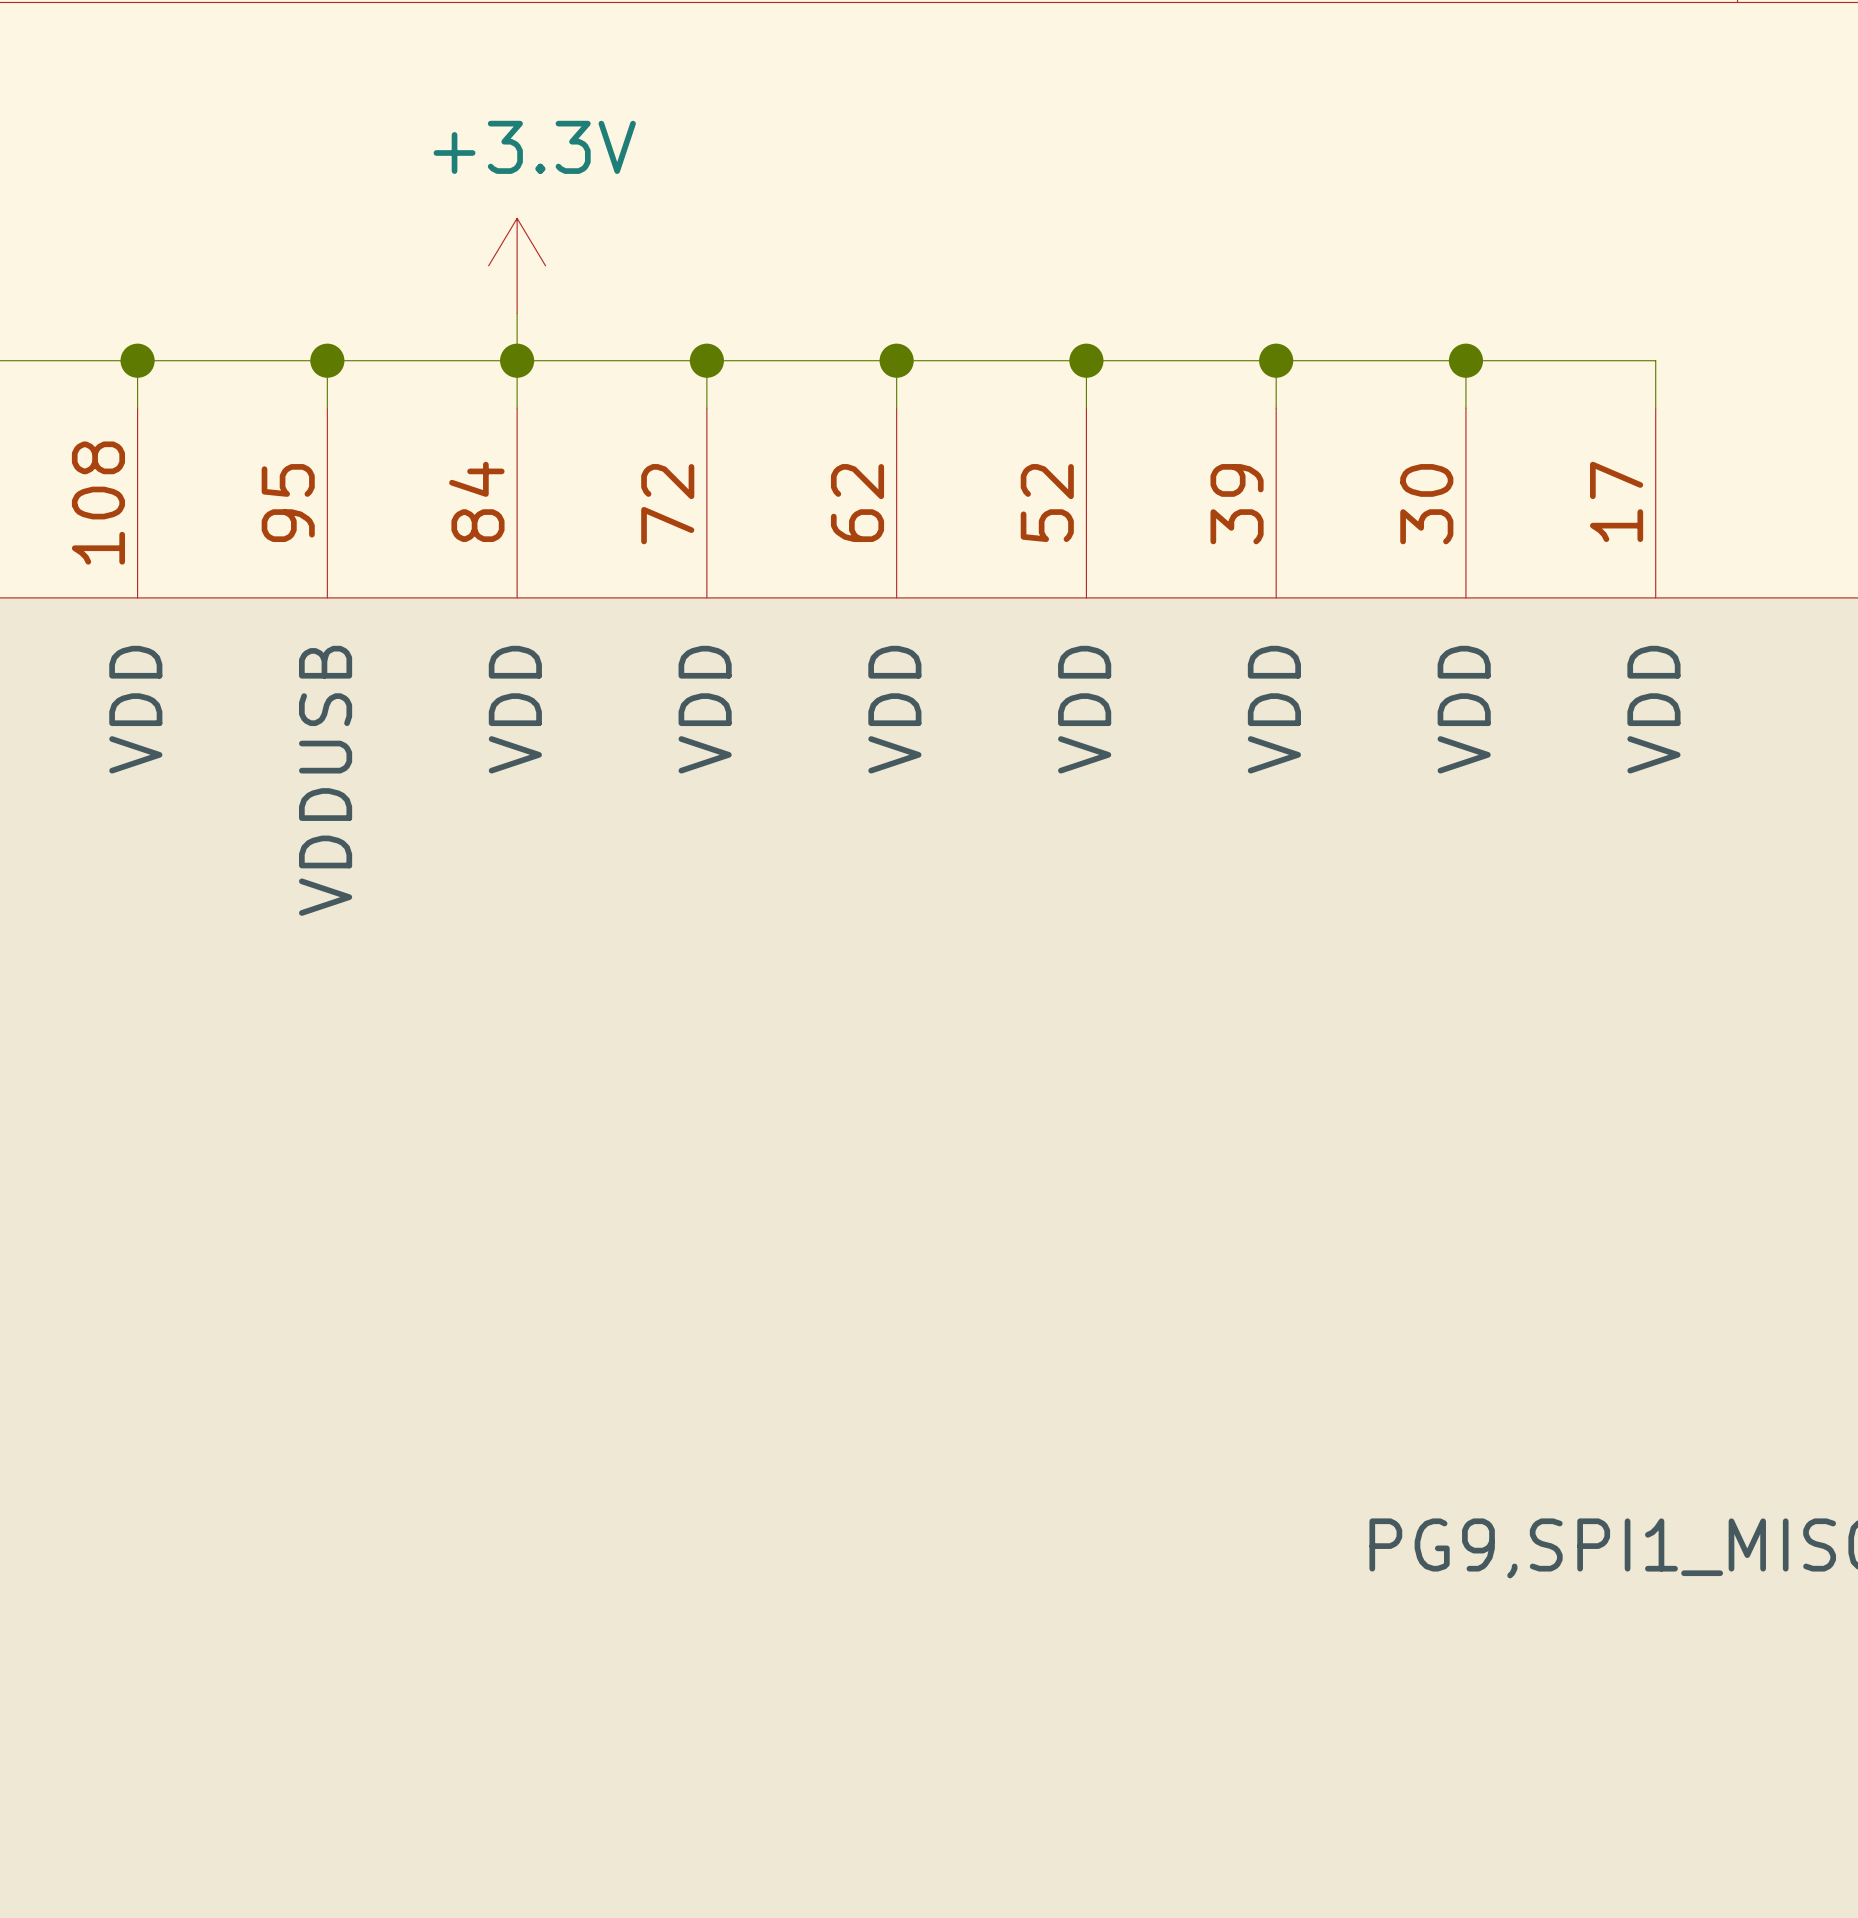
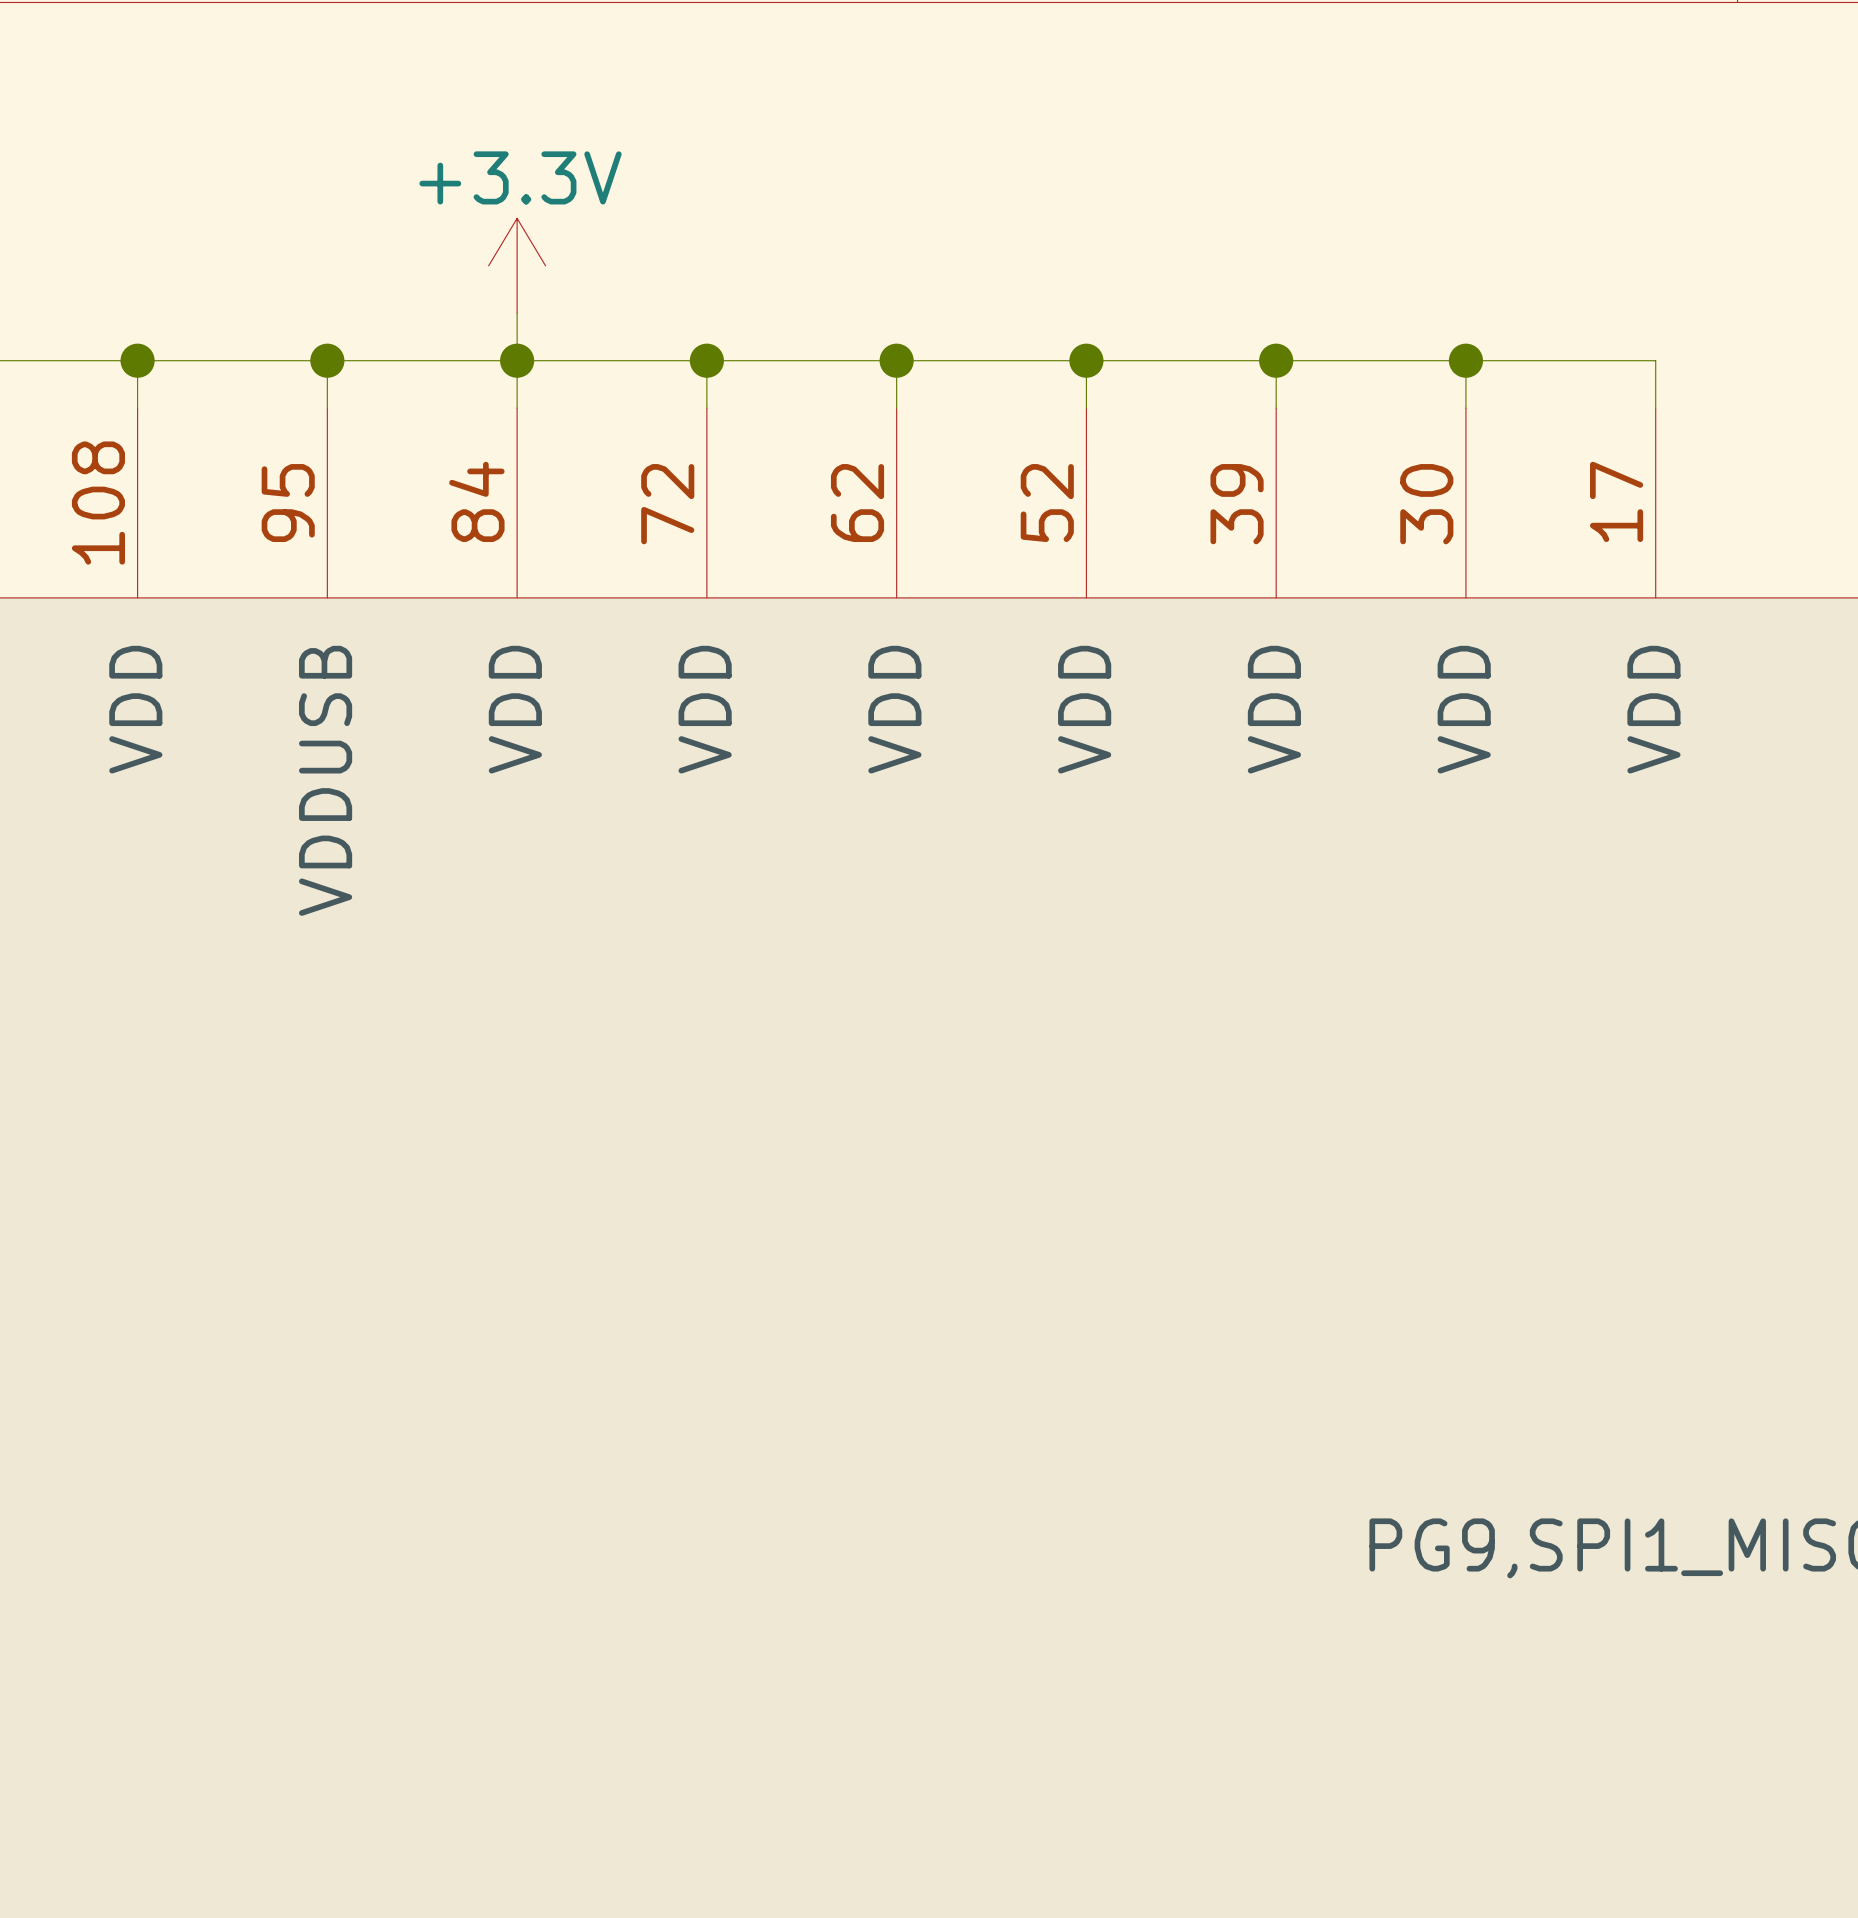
power symbol text position: +3.3V (534, 147) -> +3.3V (520, 177)

